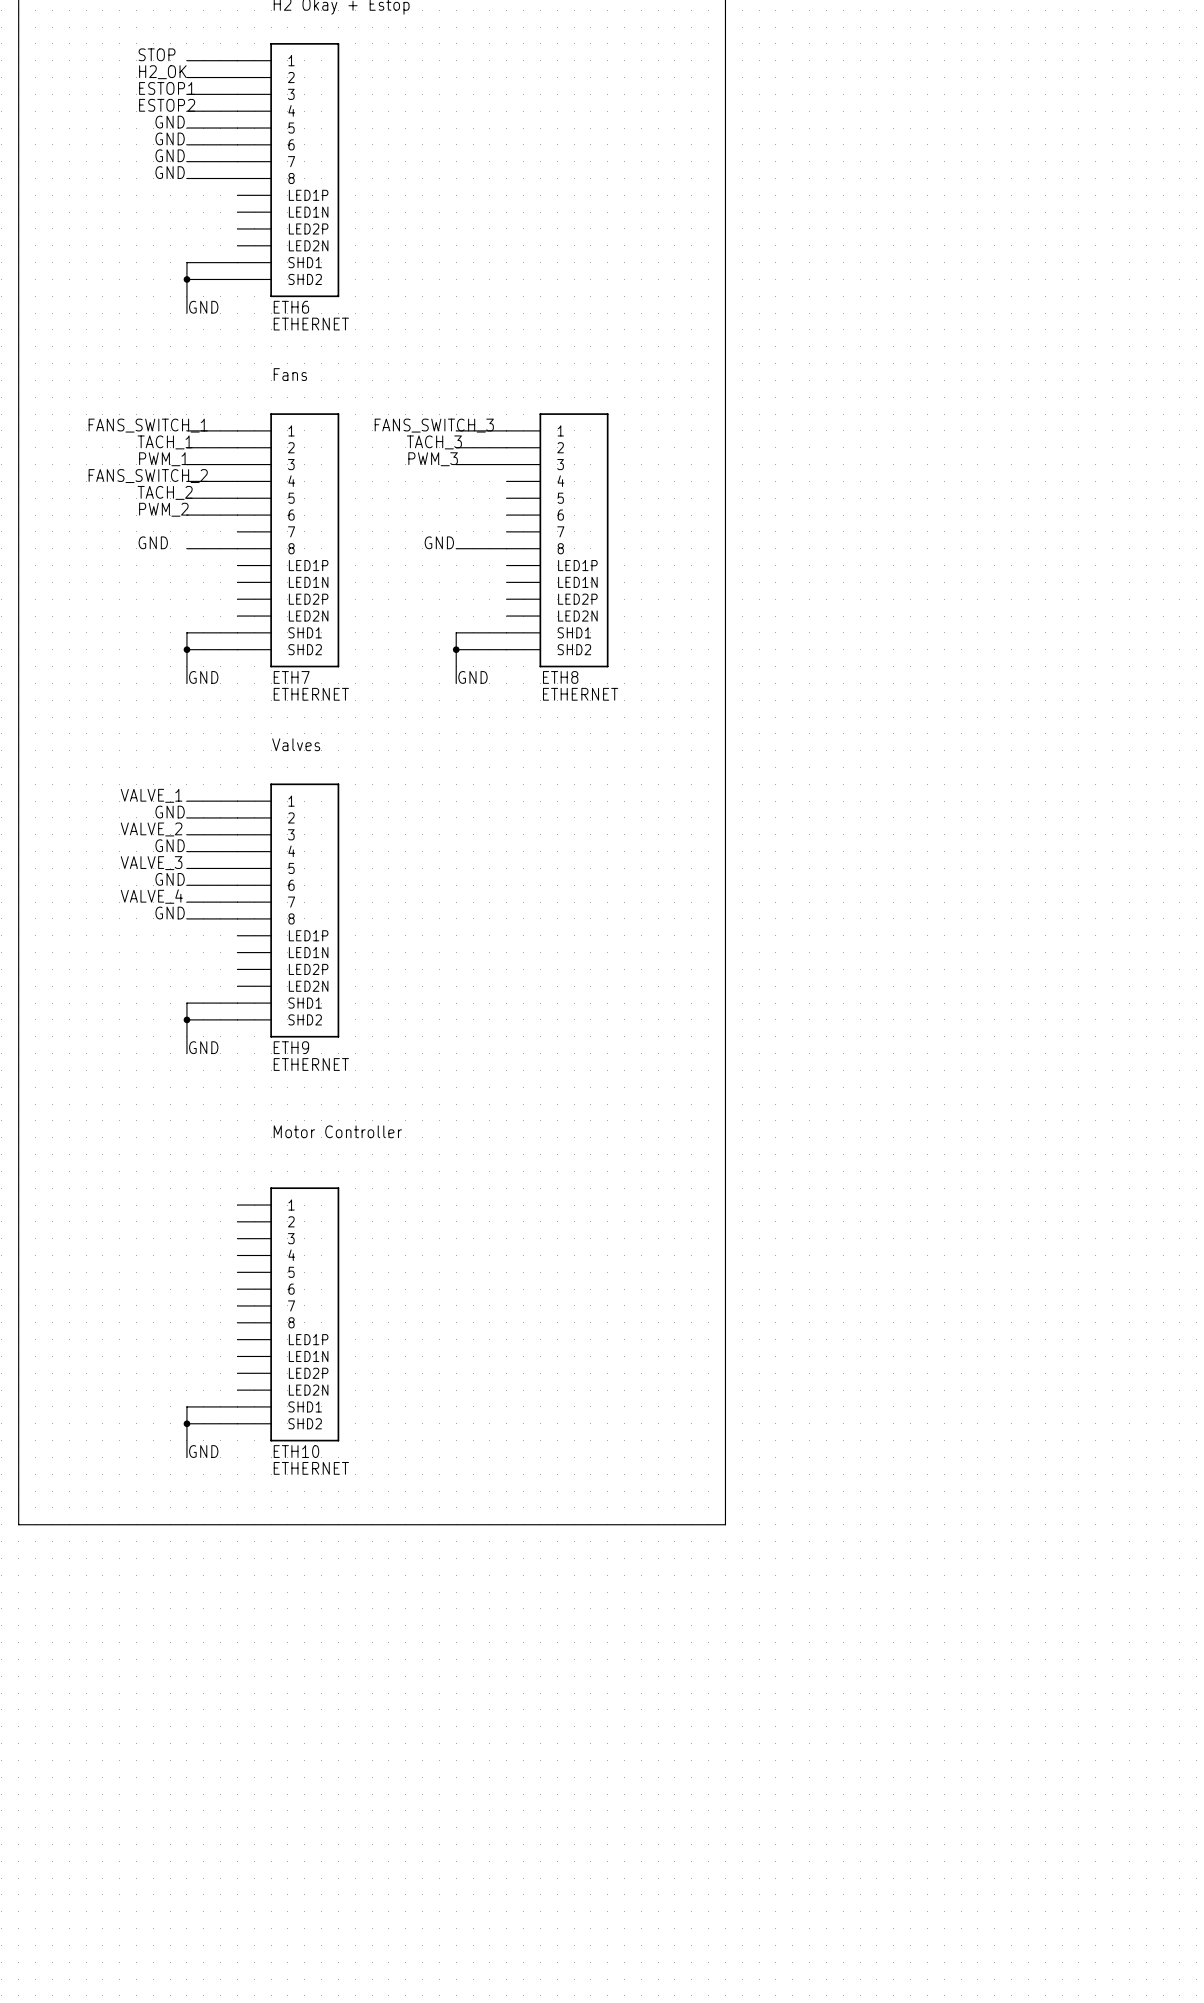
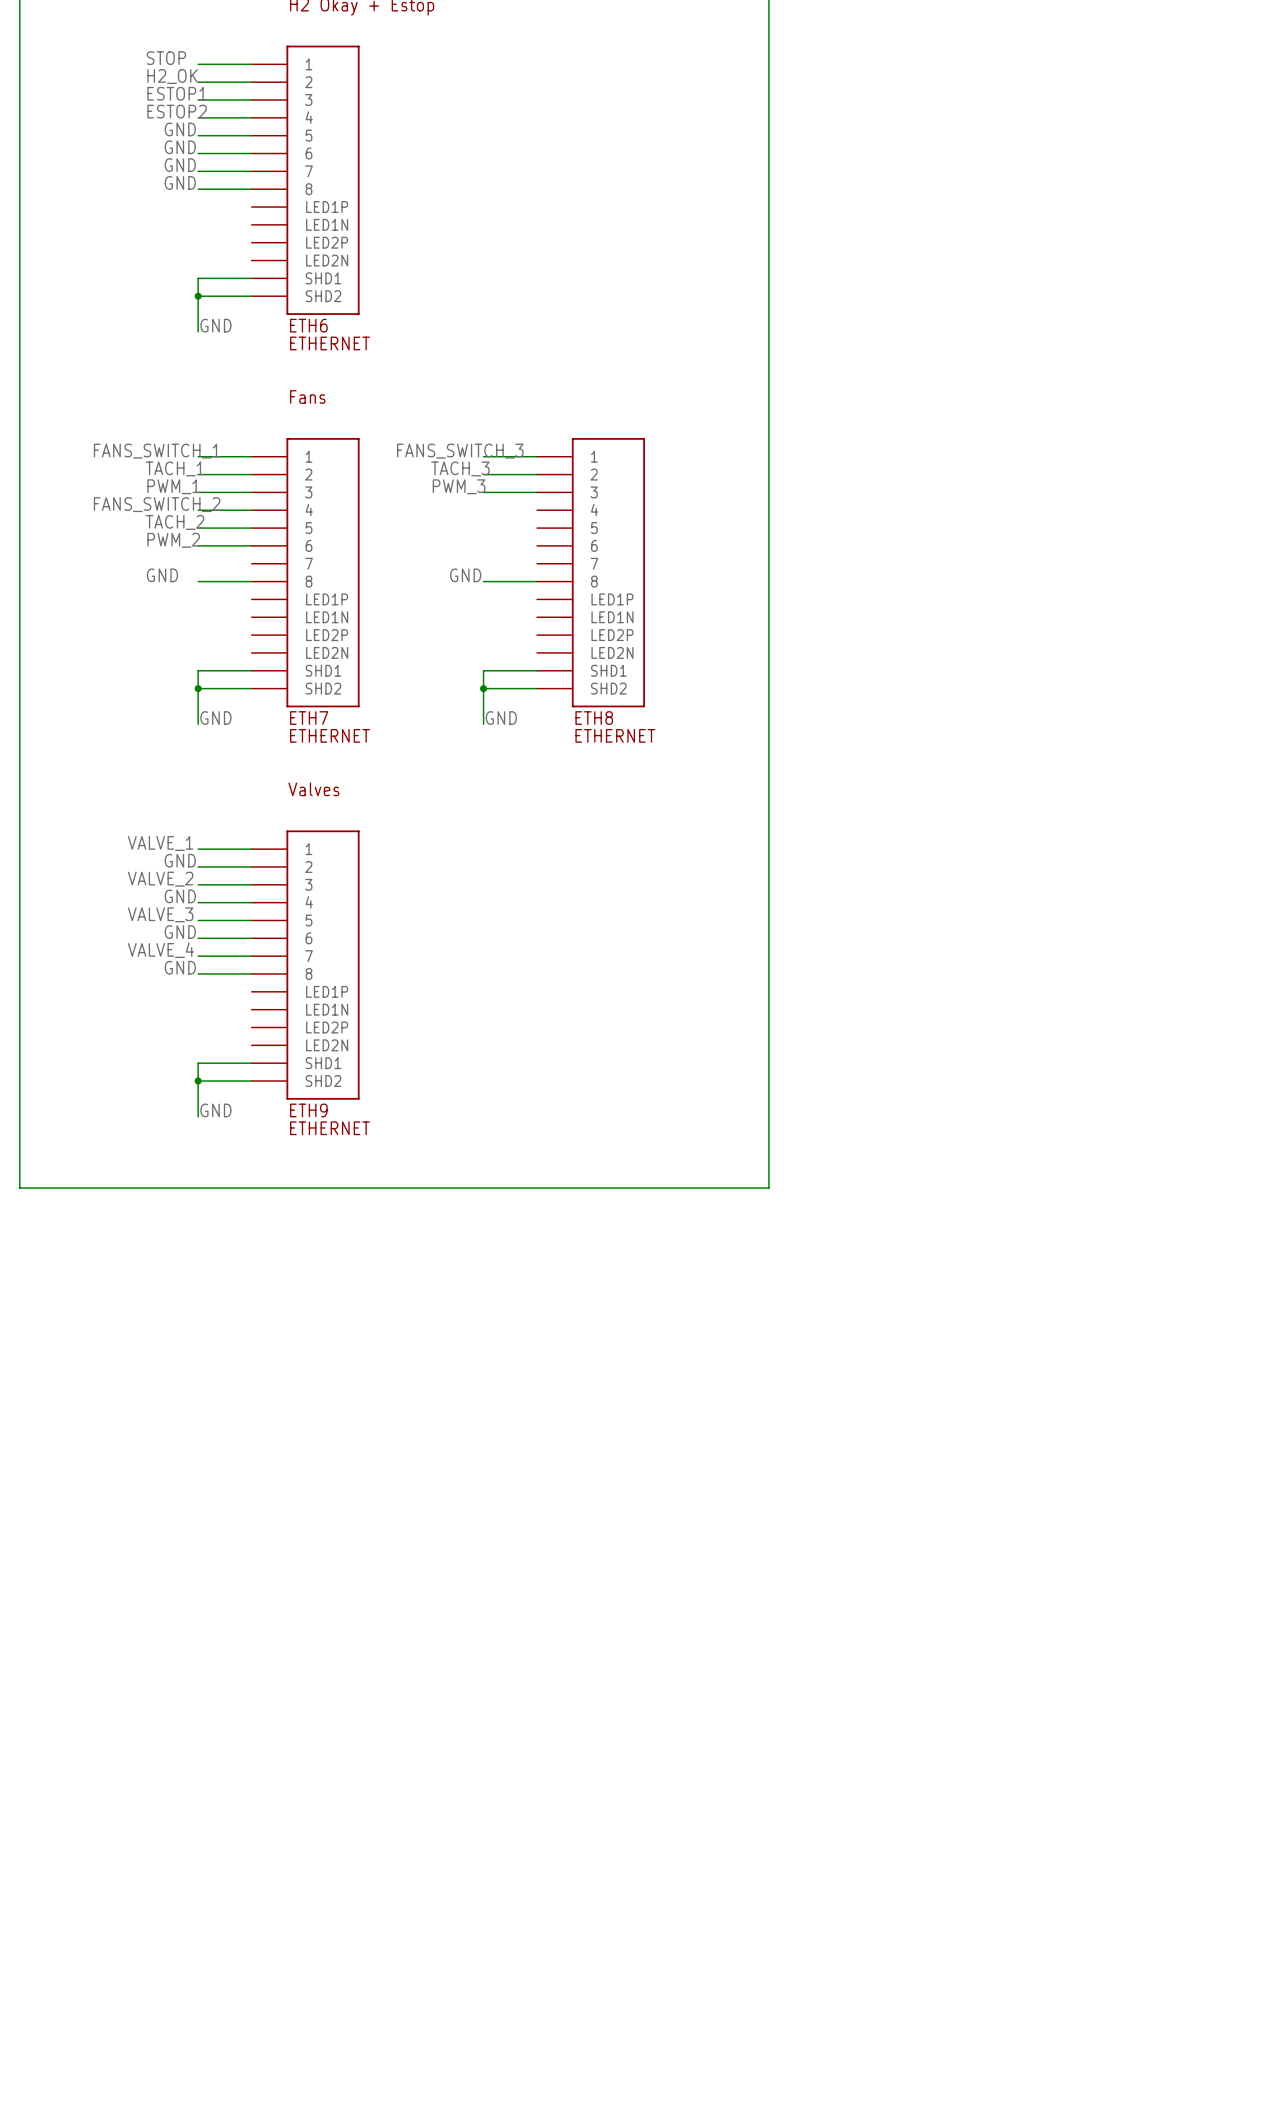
wire: (18, 1120) (18, 1524) (725, 1524) (725, 1120) -> (19, 1188) (768, 1188)
text: Motor Controller (337, 1131) -> none
ETH10: ETHERNET (288, 1314) -> none
wire: (237, 1406) (186, 1406) (186, 1457) -> none
wire: (186, 1423) (237, 1423) -> none
junction: (186, 1423) -> none
label: GND (203, 1451) -> none

